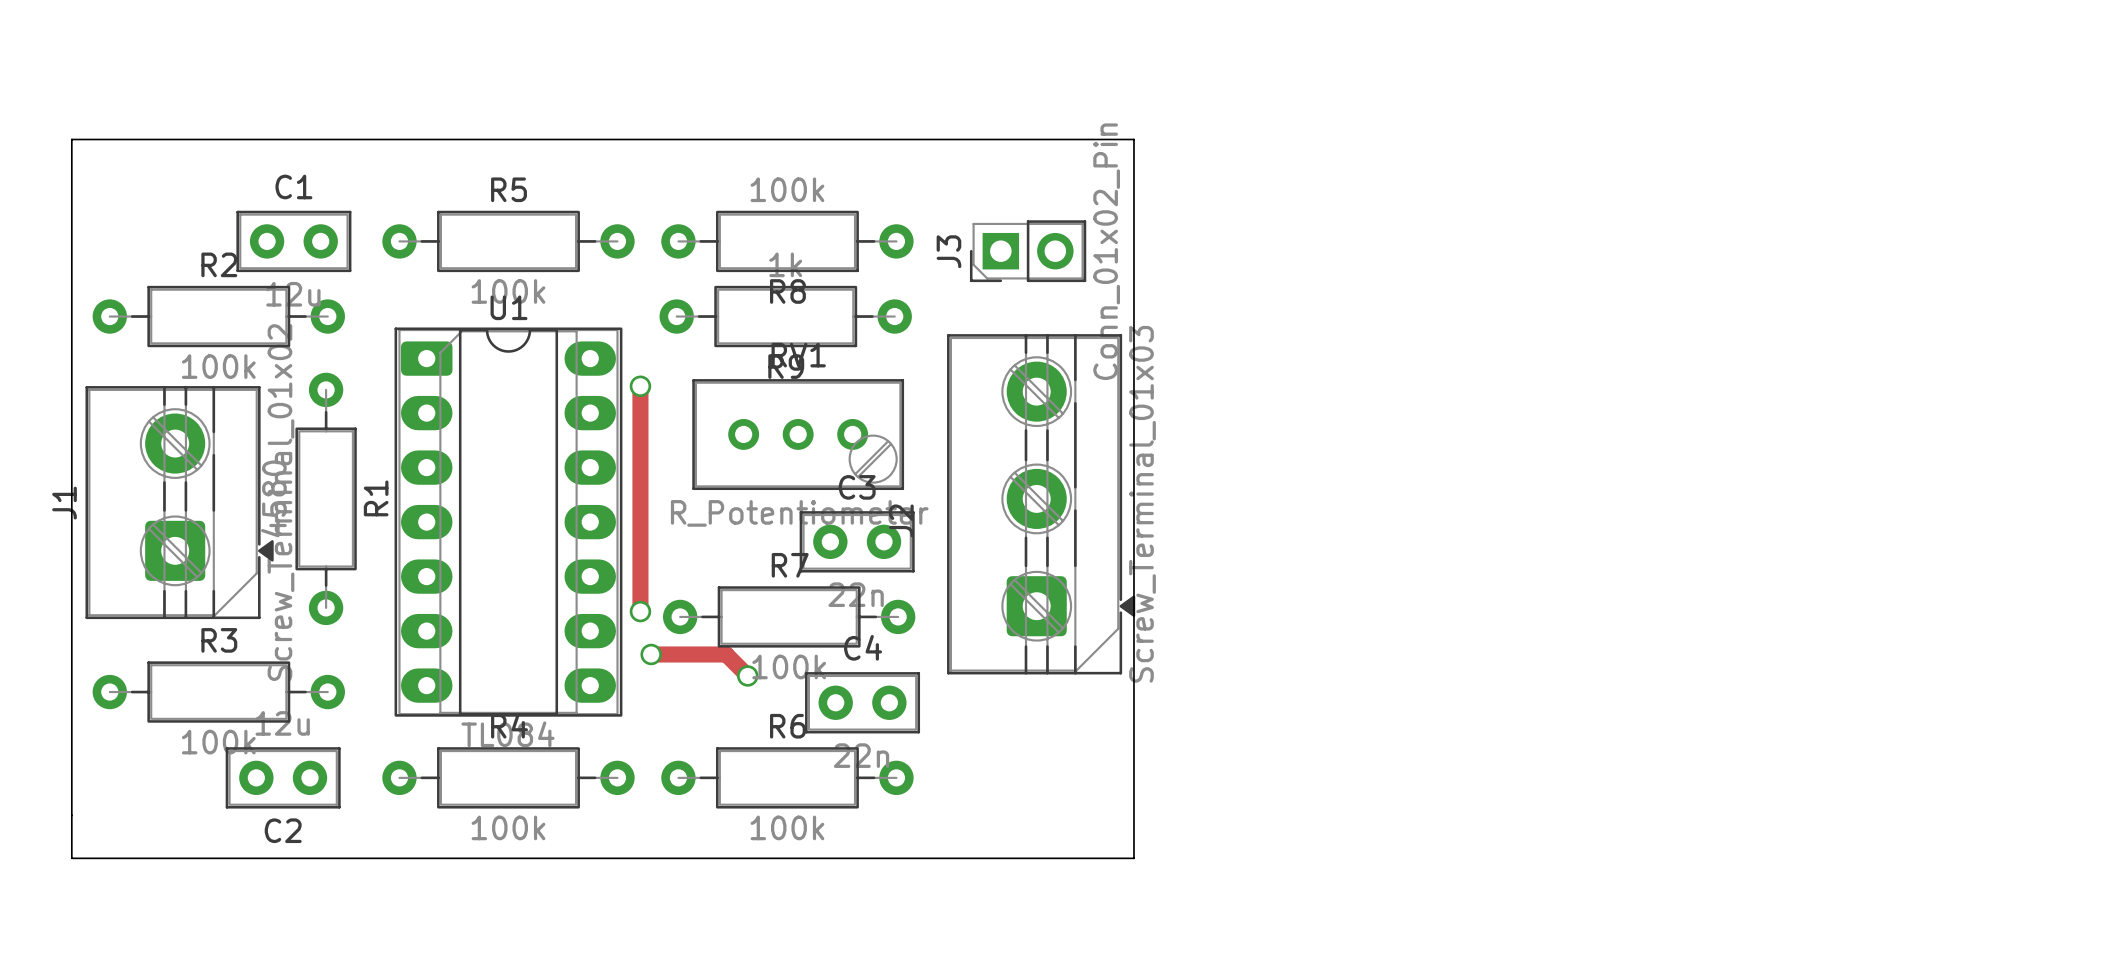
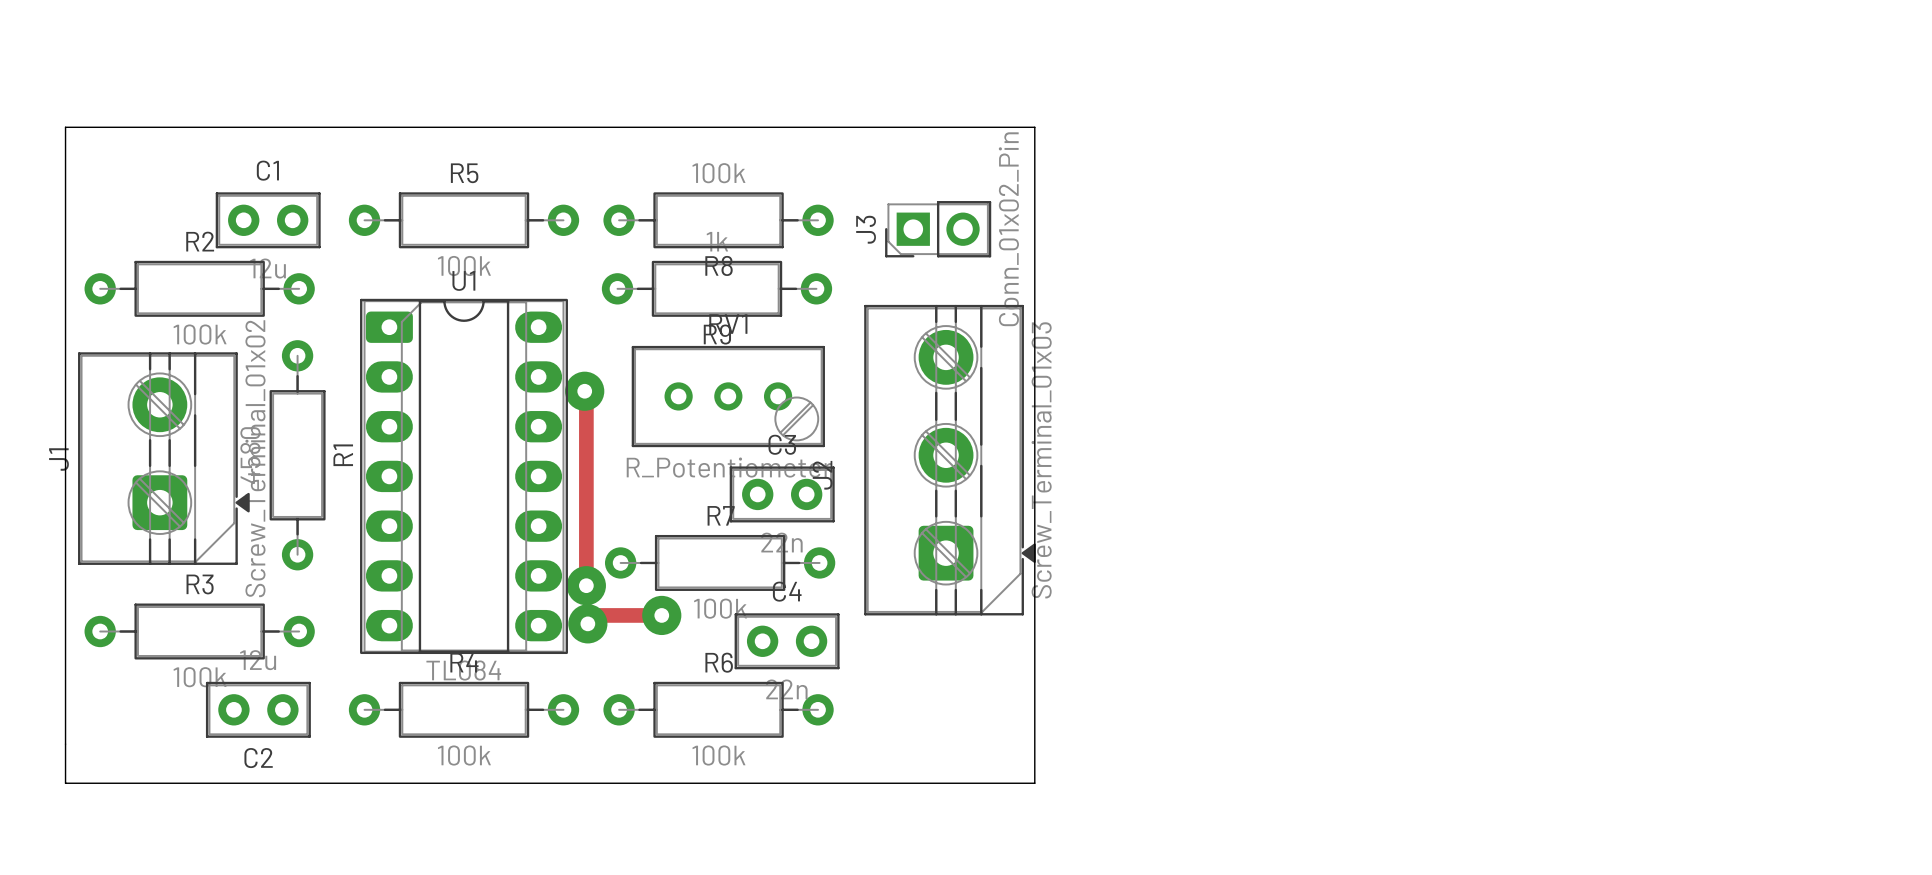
track: (640, 386) (640, 611) -> none
via: (640, 386) -> none
track: none -> (584, 391) (586, 392) (586, 585)
via: none -> (584, 391)
via: (640, 611) -> none
via: none -> (586, 585)
track: (651, 654) (726, 654) (747, 675) -> none
via: (651, 654) -> none
track: none -> (661, 615) (595, 615) (587, 623)
via: none -> (661, 615)
via: (747, 675) -> none
via: none -> (587, 623)

